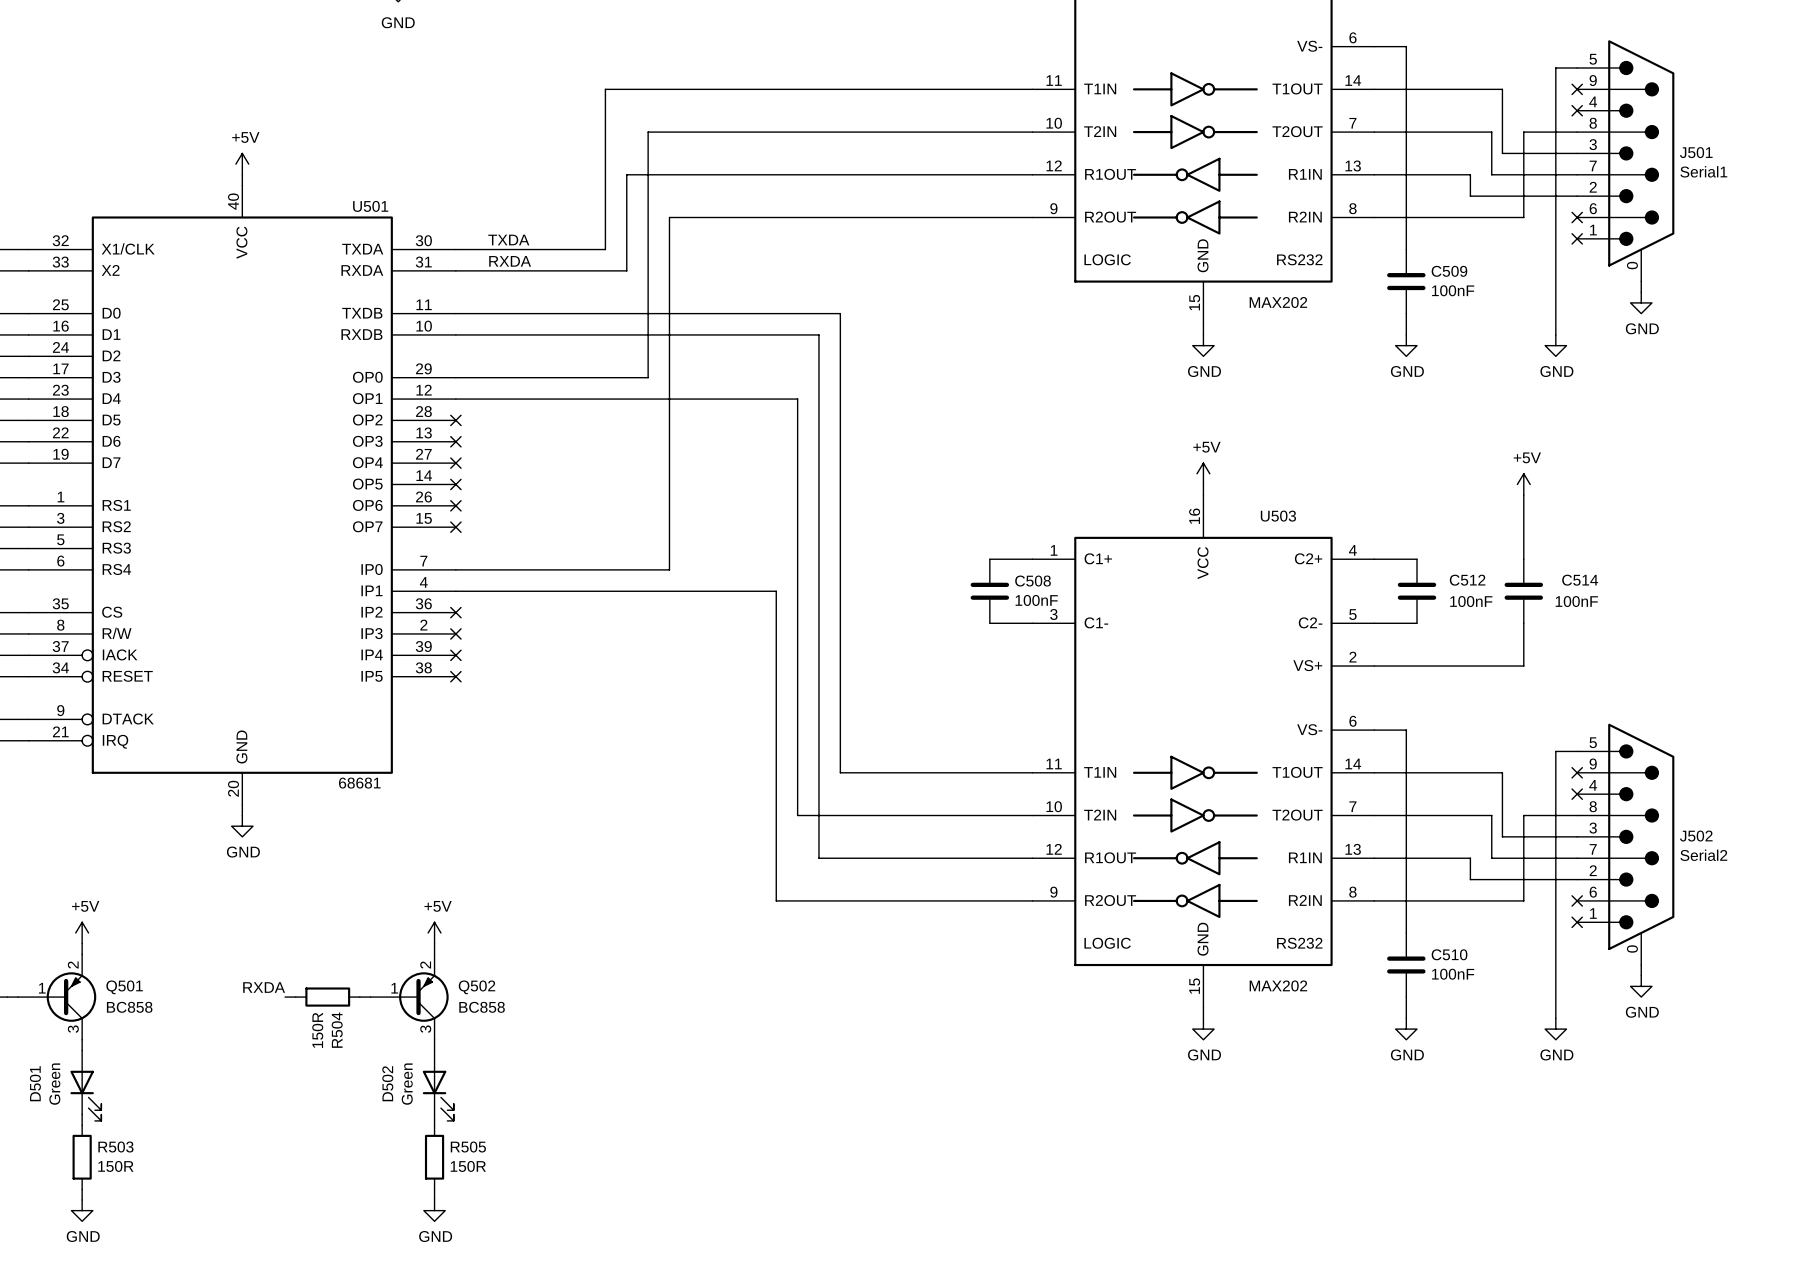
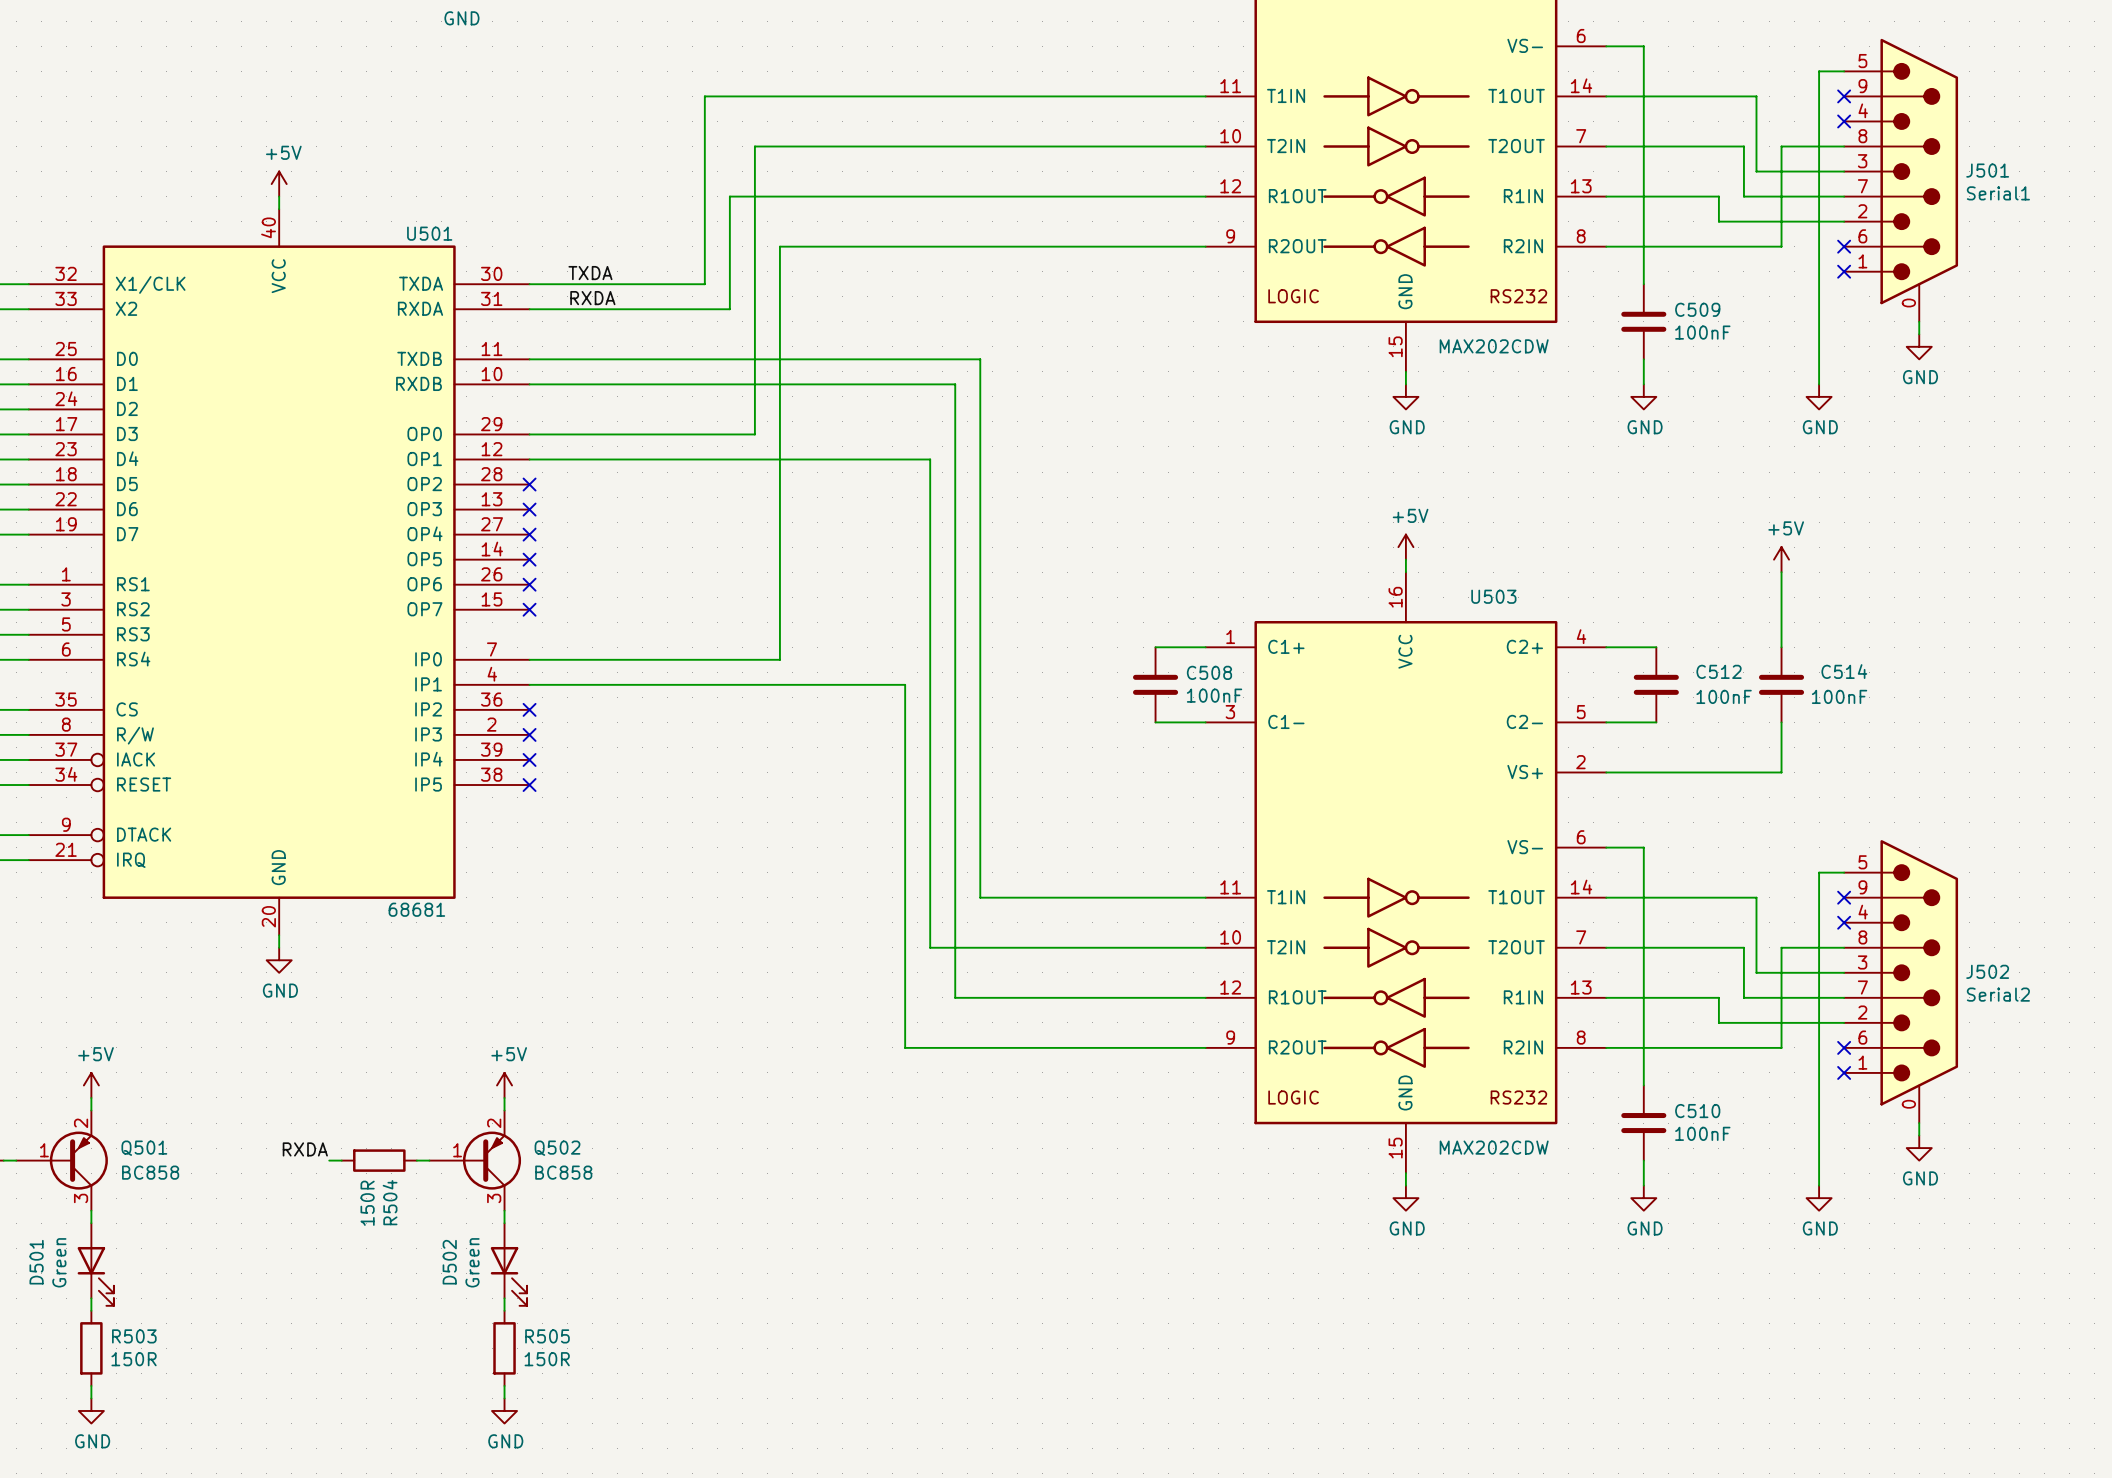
part value: MAX202 (1278, 302) -> MAX202CDW (1494, 346)
U503 value: MAX202 (1278, 985) -> MAX202CDW (1494, 1147)

